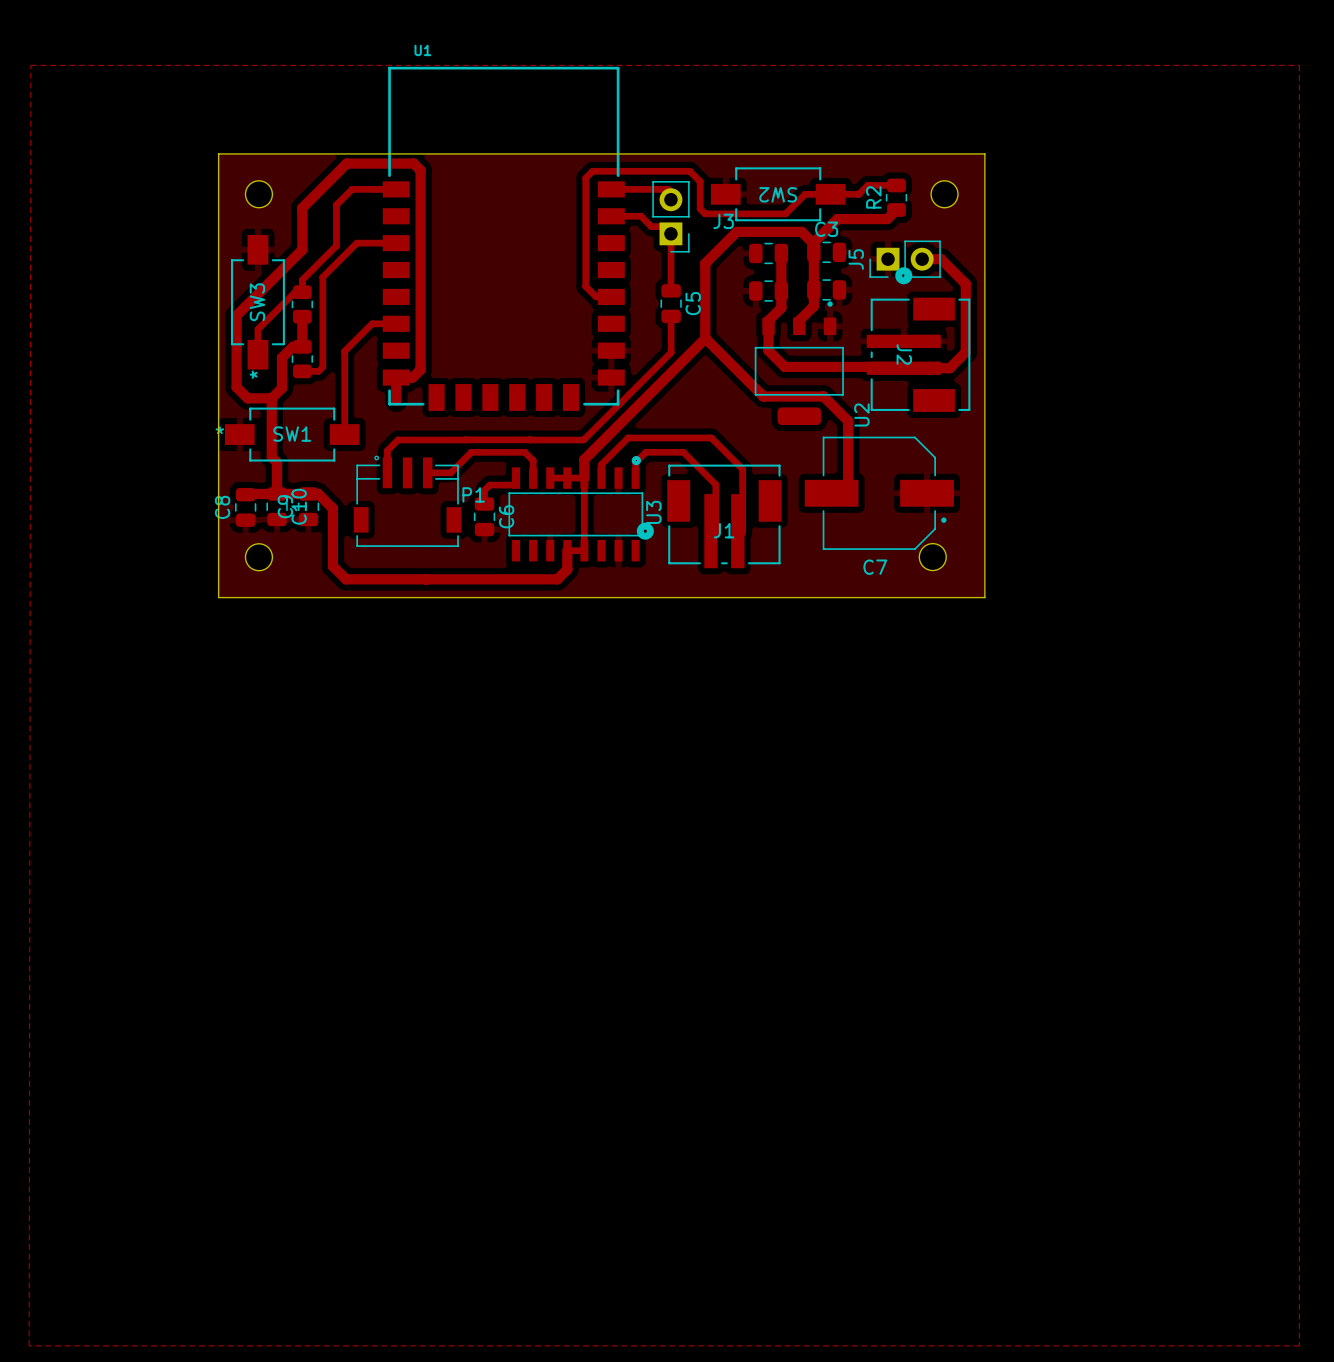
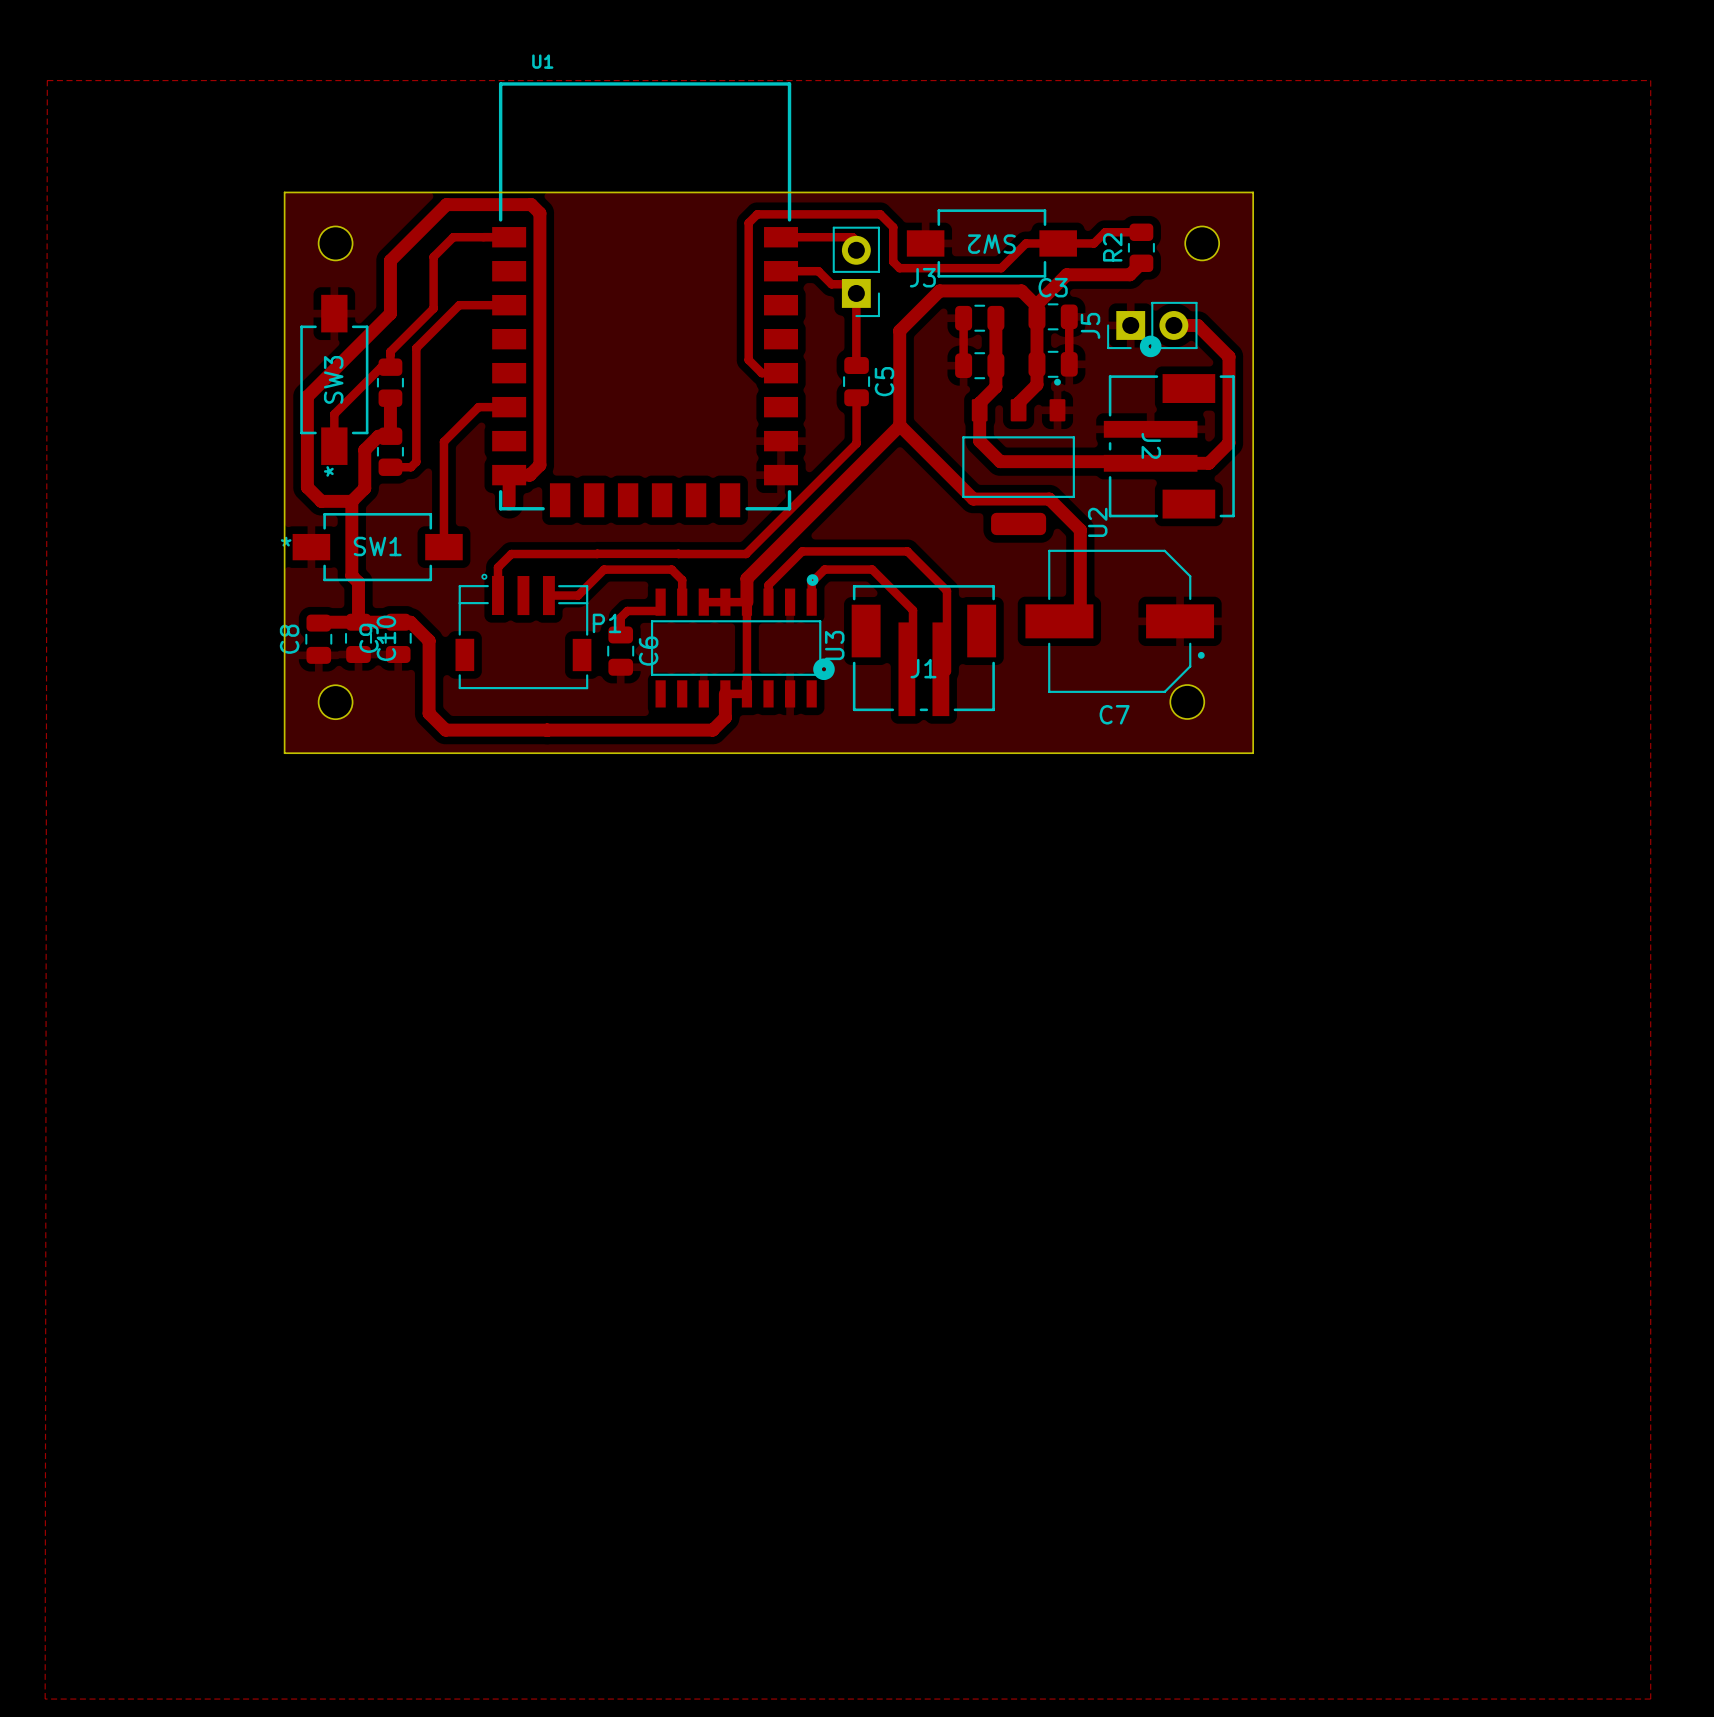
track: none -> (1069, 316) (1069, 364)
track: none -> (963, 318) (963, 365)

